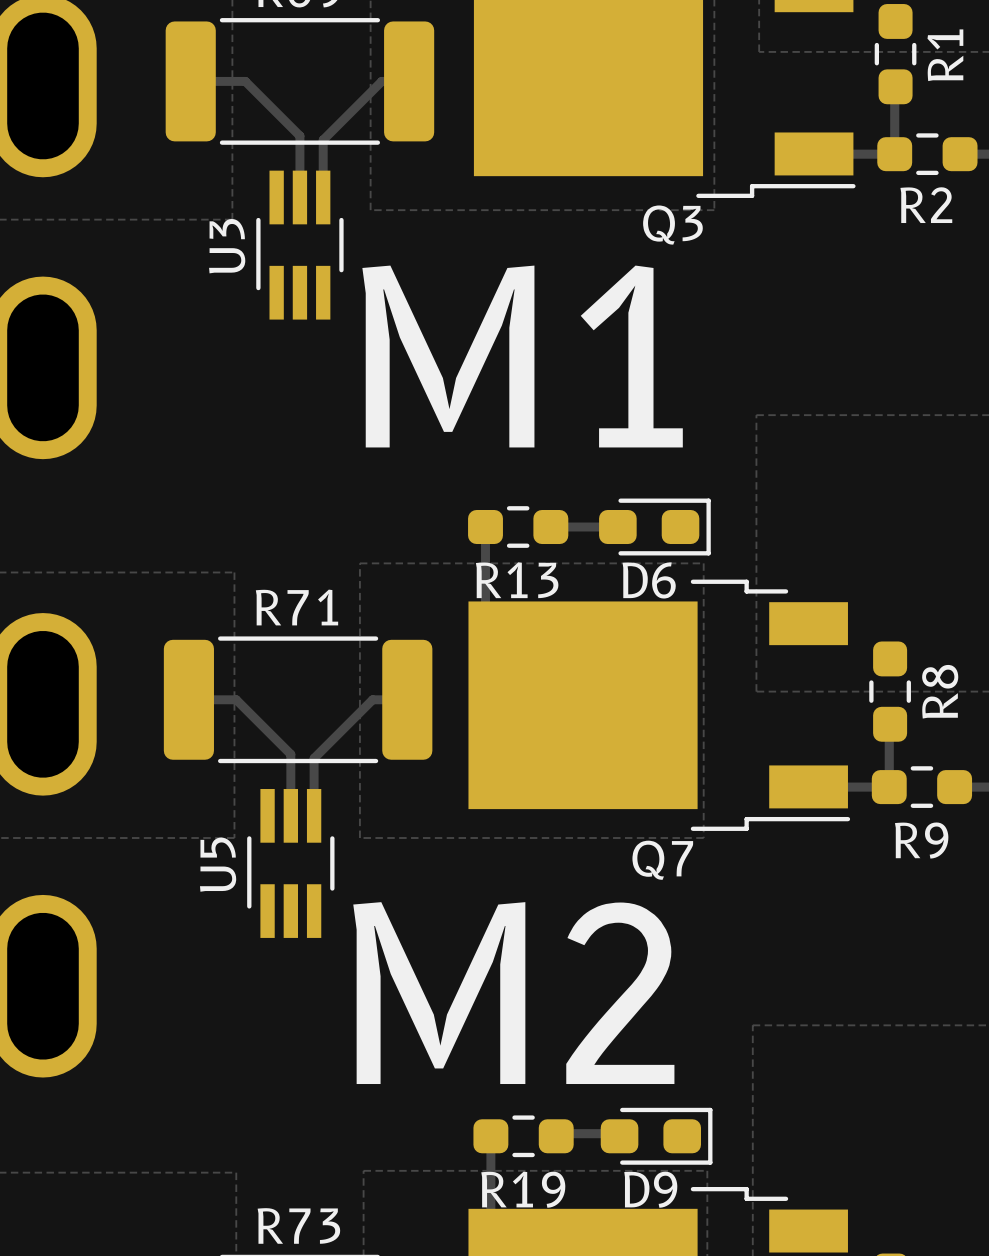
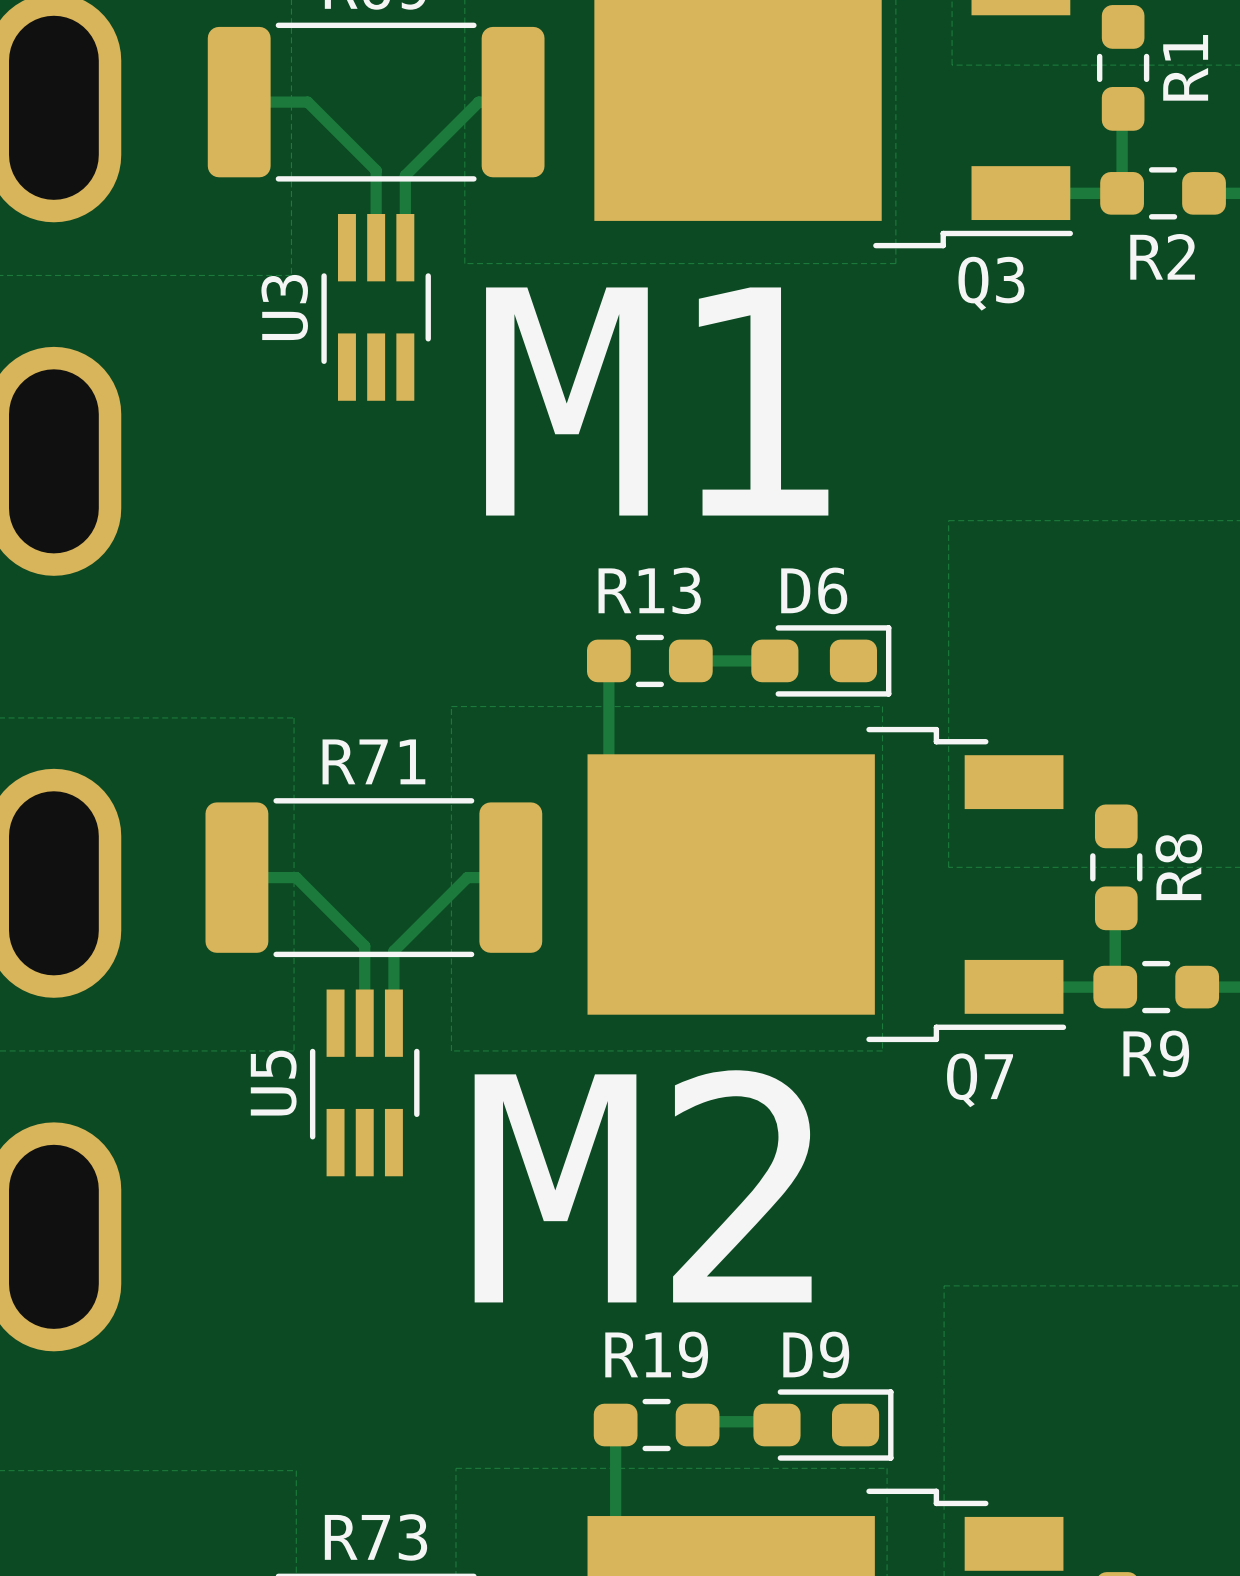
Q3 name position: Q3 (672, 225) -> Q3 (991, 283)
text position: M1 (522, 356) -> M1 (657, 401)
R13 name position: R13 (517, 580) -> R13 (649, 590)
D6 name position: D6 (649, 580) -> D6 (814, 590)
Q7 name position: Q7 (662, 860) -> Q7 (980, 1080)
text position: M2 (513, 993) -> M2 (643, 1186)
R19 name position: R19 (523, 1189) -> R19 (656, 1354)
D9 name position: D9 (650, 1189) -> D9 (816, 1354)

